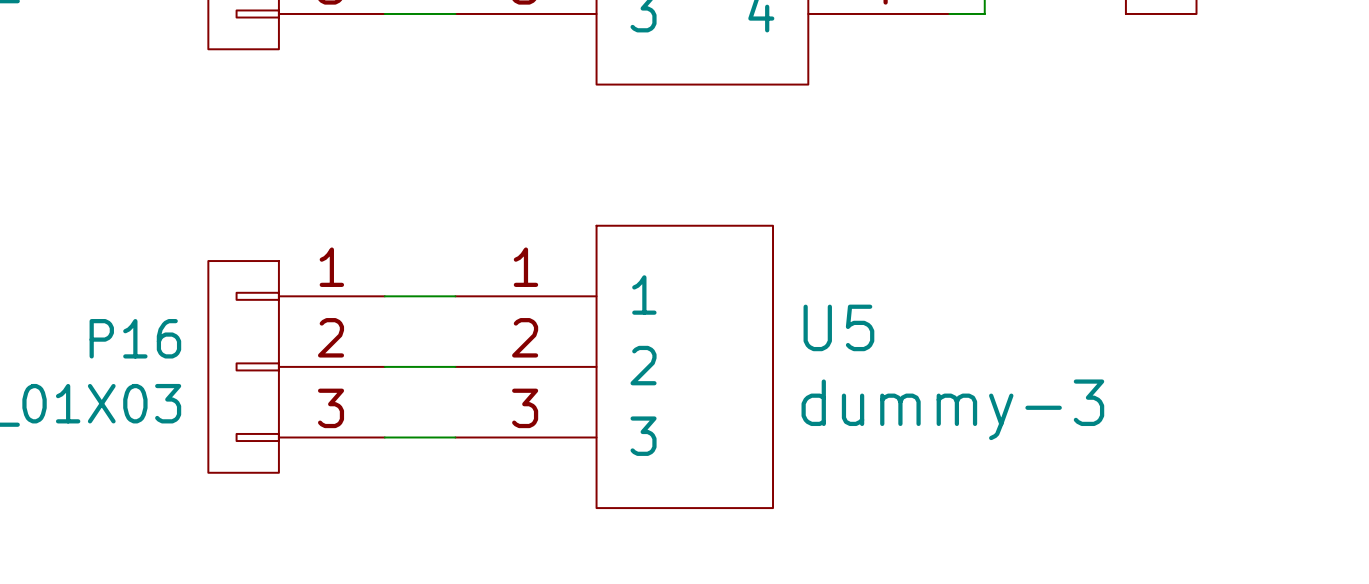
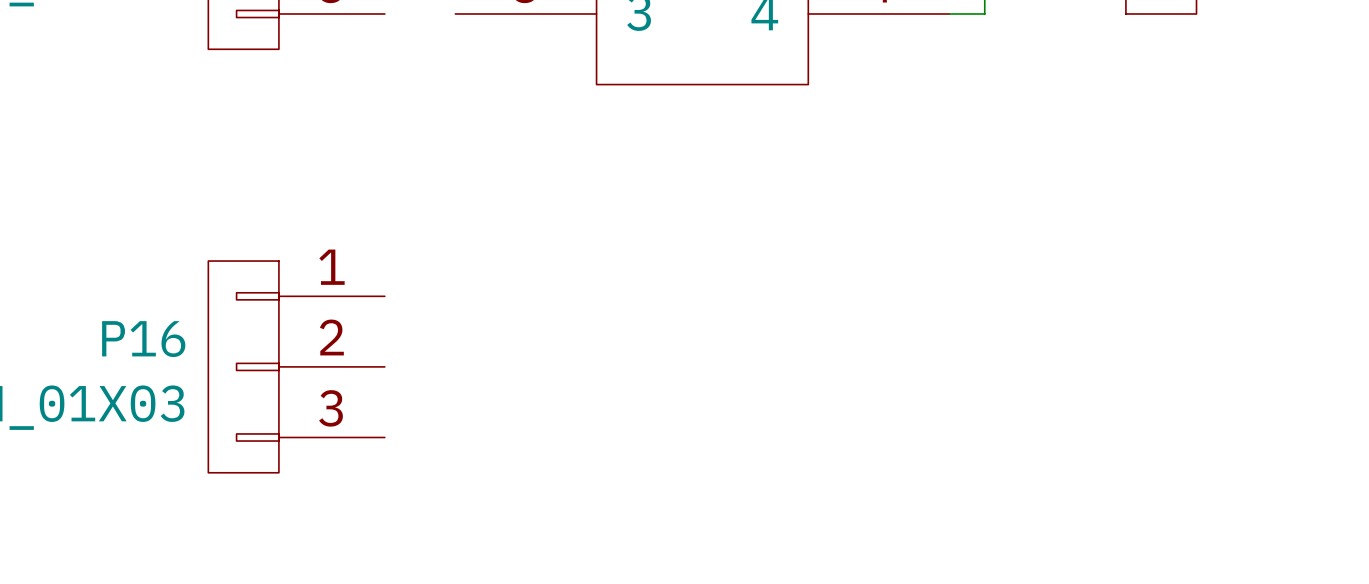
wire: (384, 13) (455, 13) -> none
wire: (384, 296) (455, 296) -> none
wire: (384, 366) (455, 366) -> none
U5: dummy-3 (614, 366) -> none
wire: (384, 437) (455, 437) -> none

